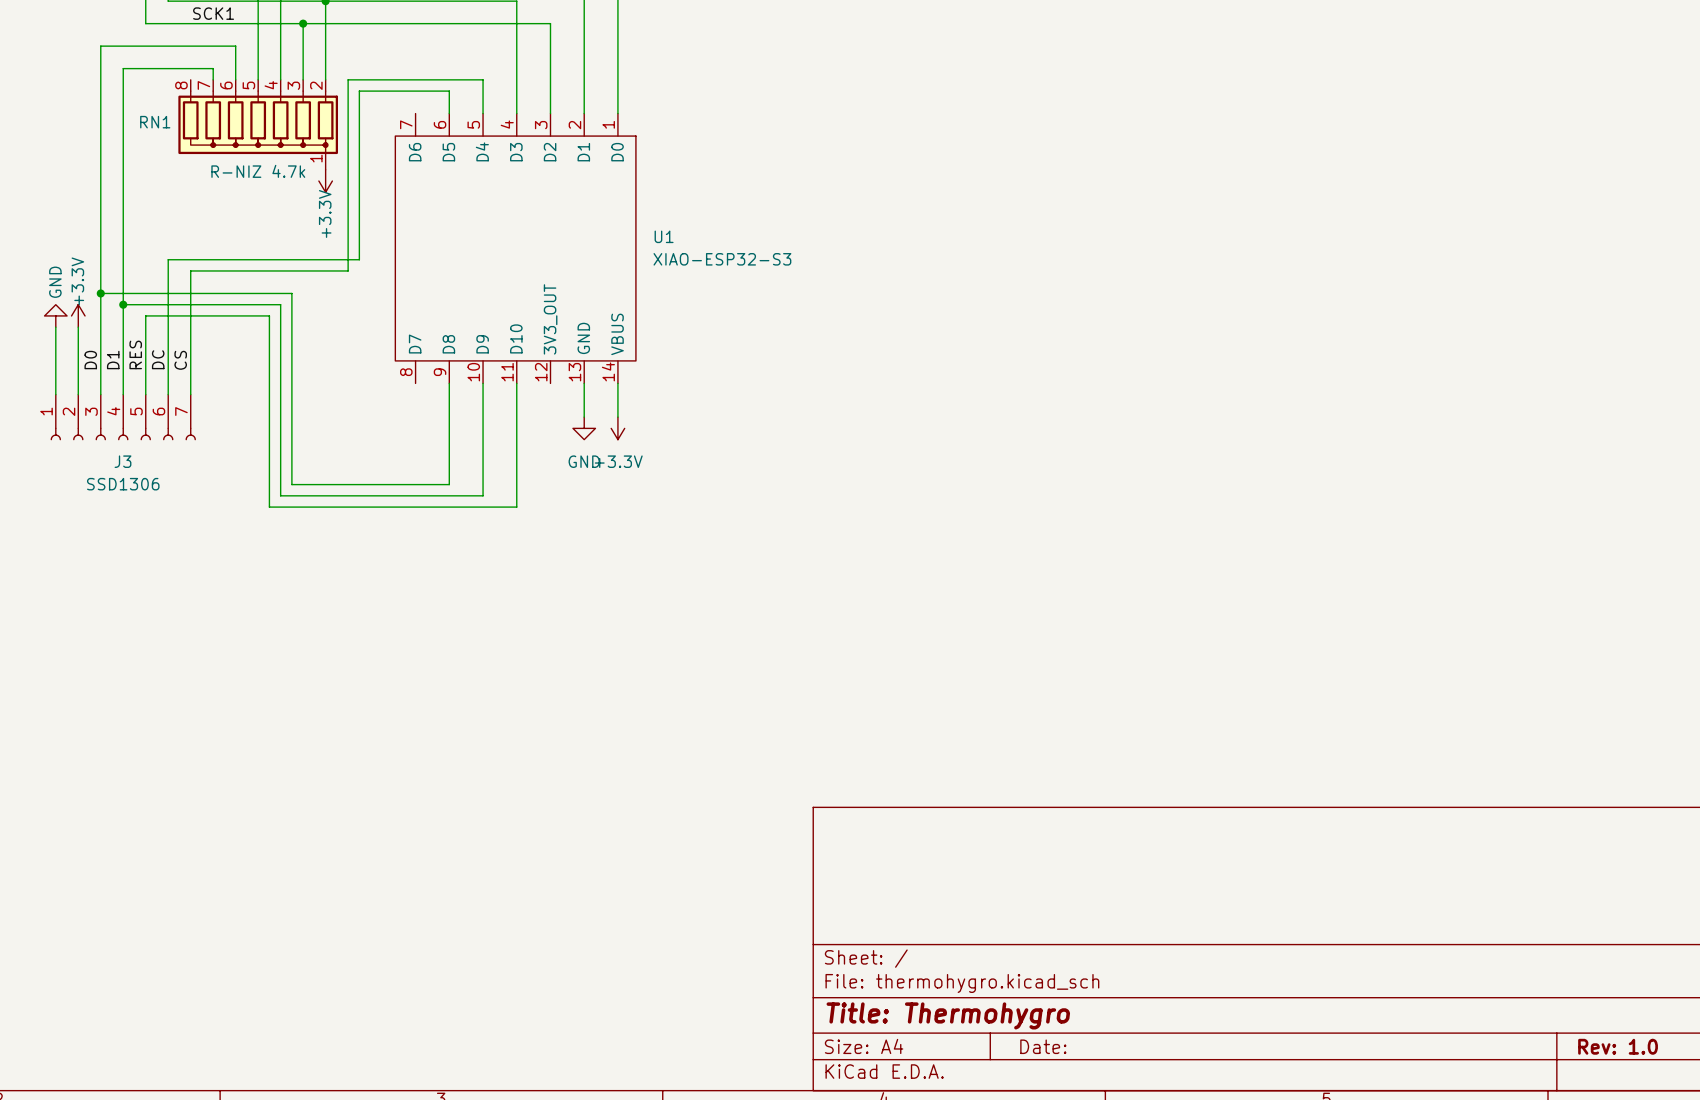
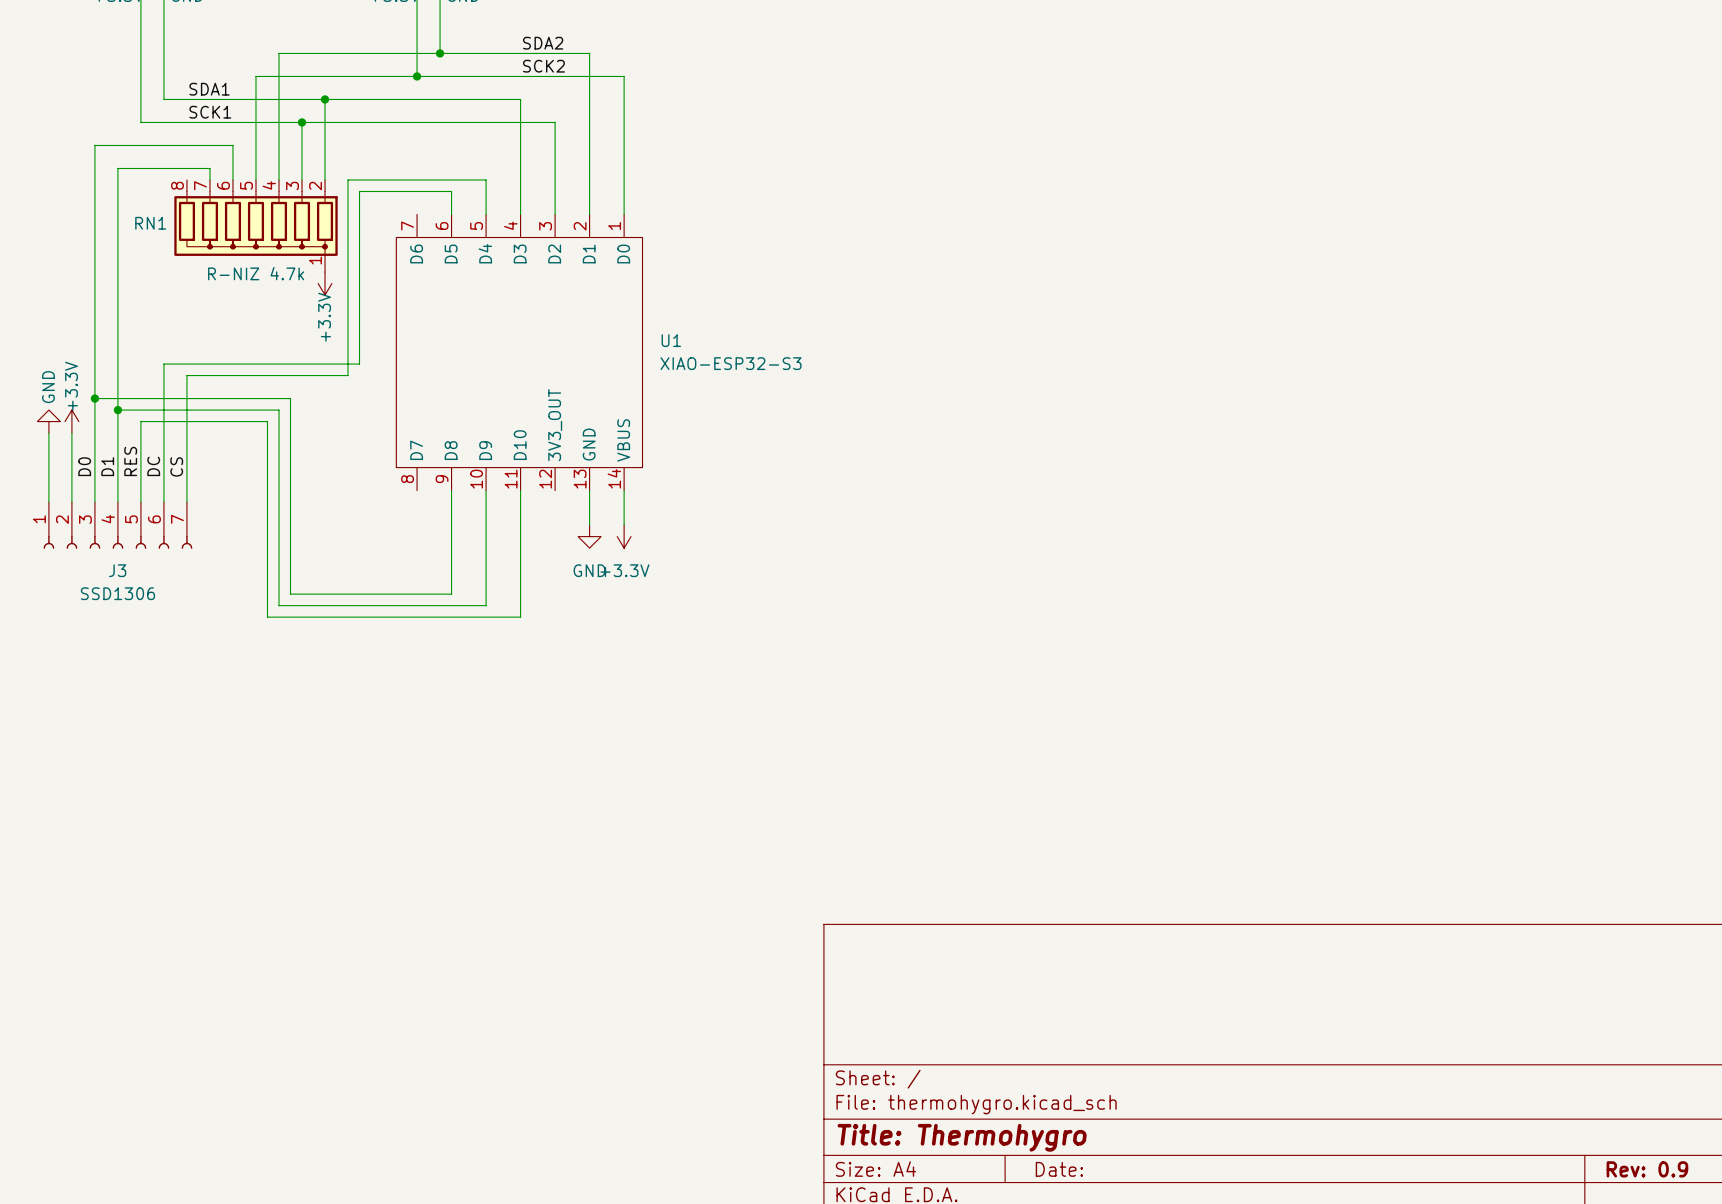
title block: Rev: 1.0 (1618, 1046) -> Rev: 0.9 (1647, 1169)

